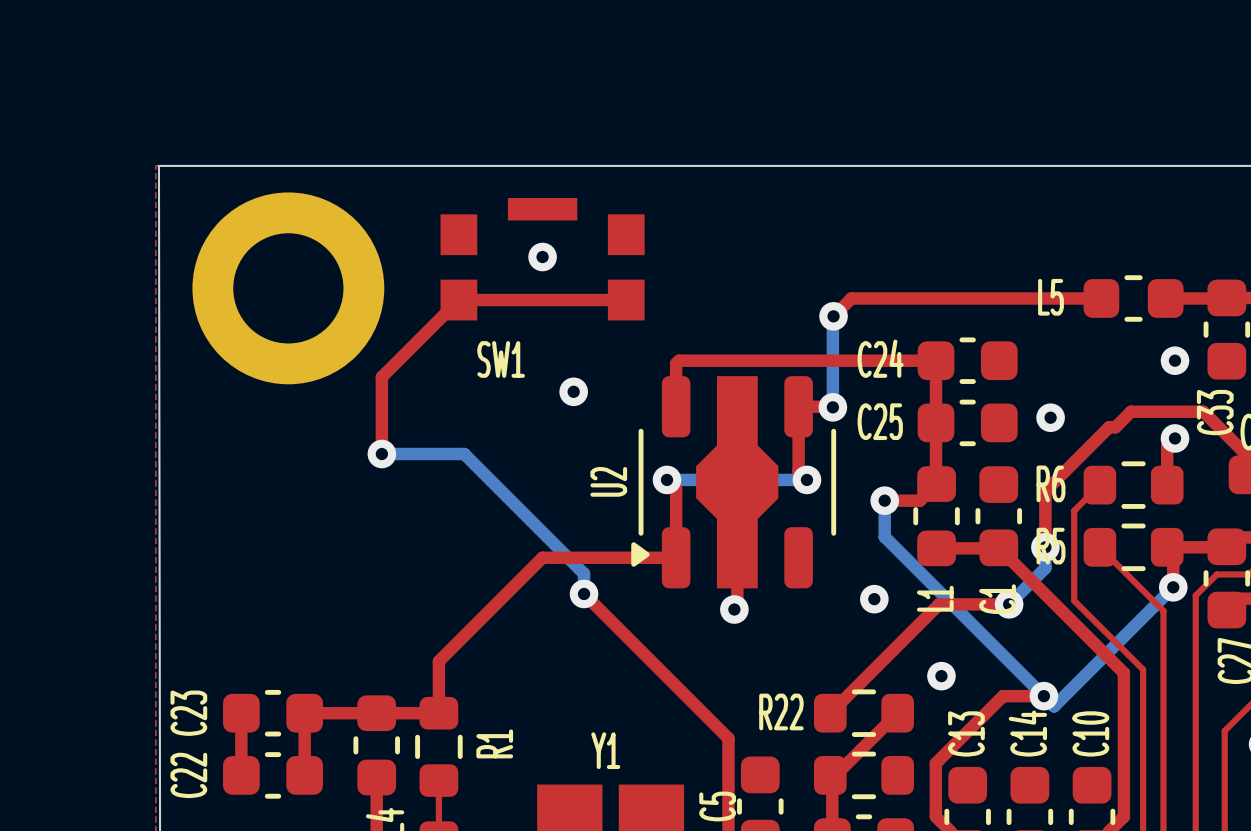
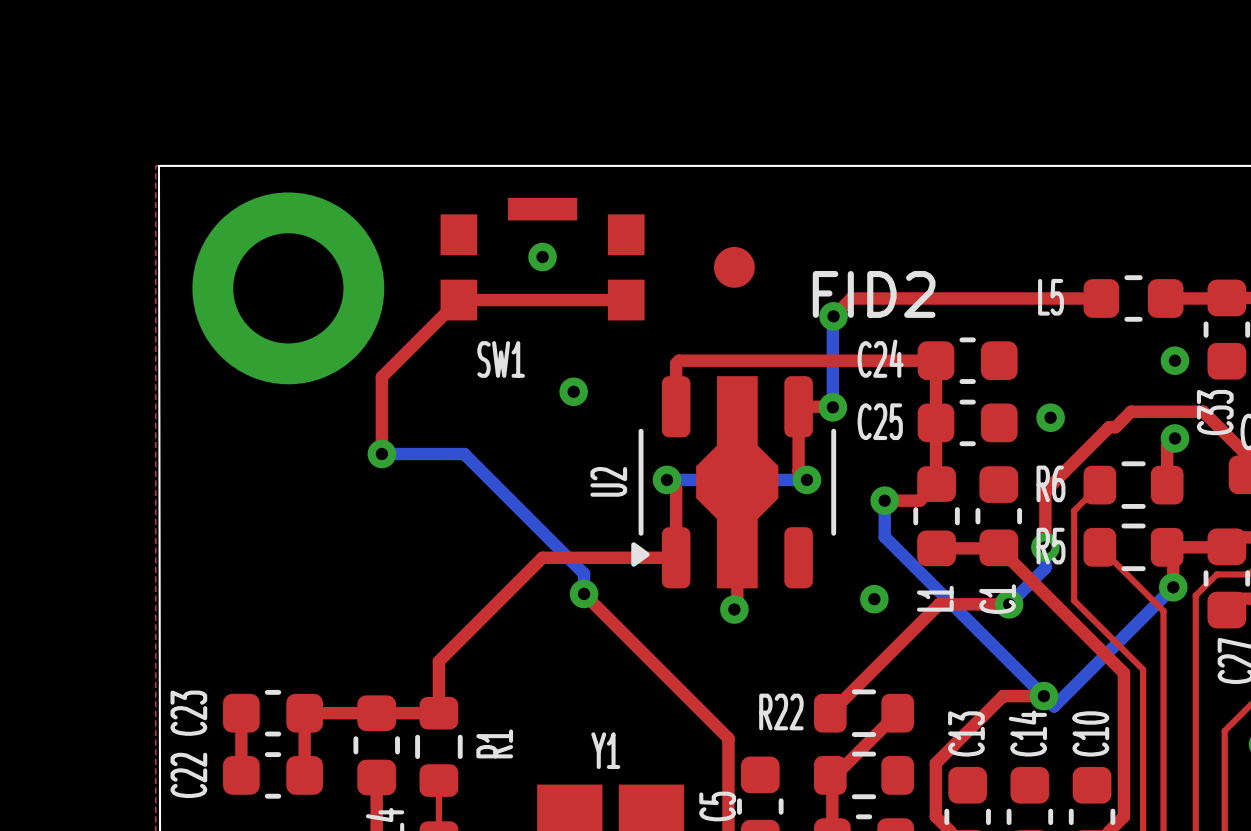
FID2: none -> (734, 267)
via: (941, 676) -> none

